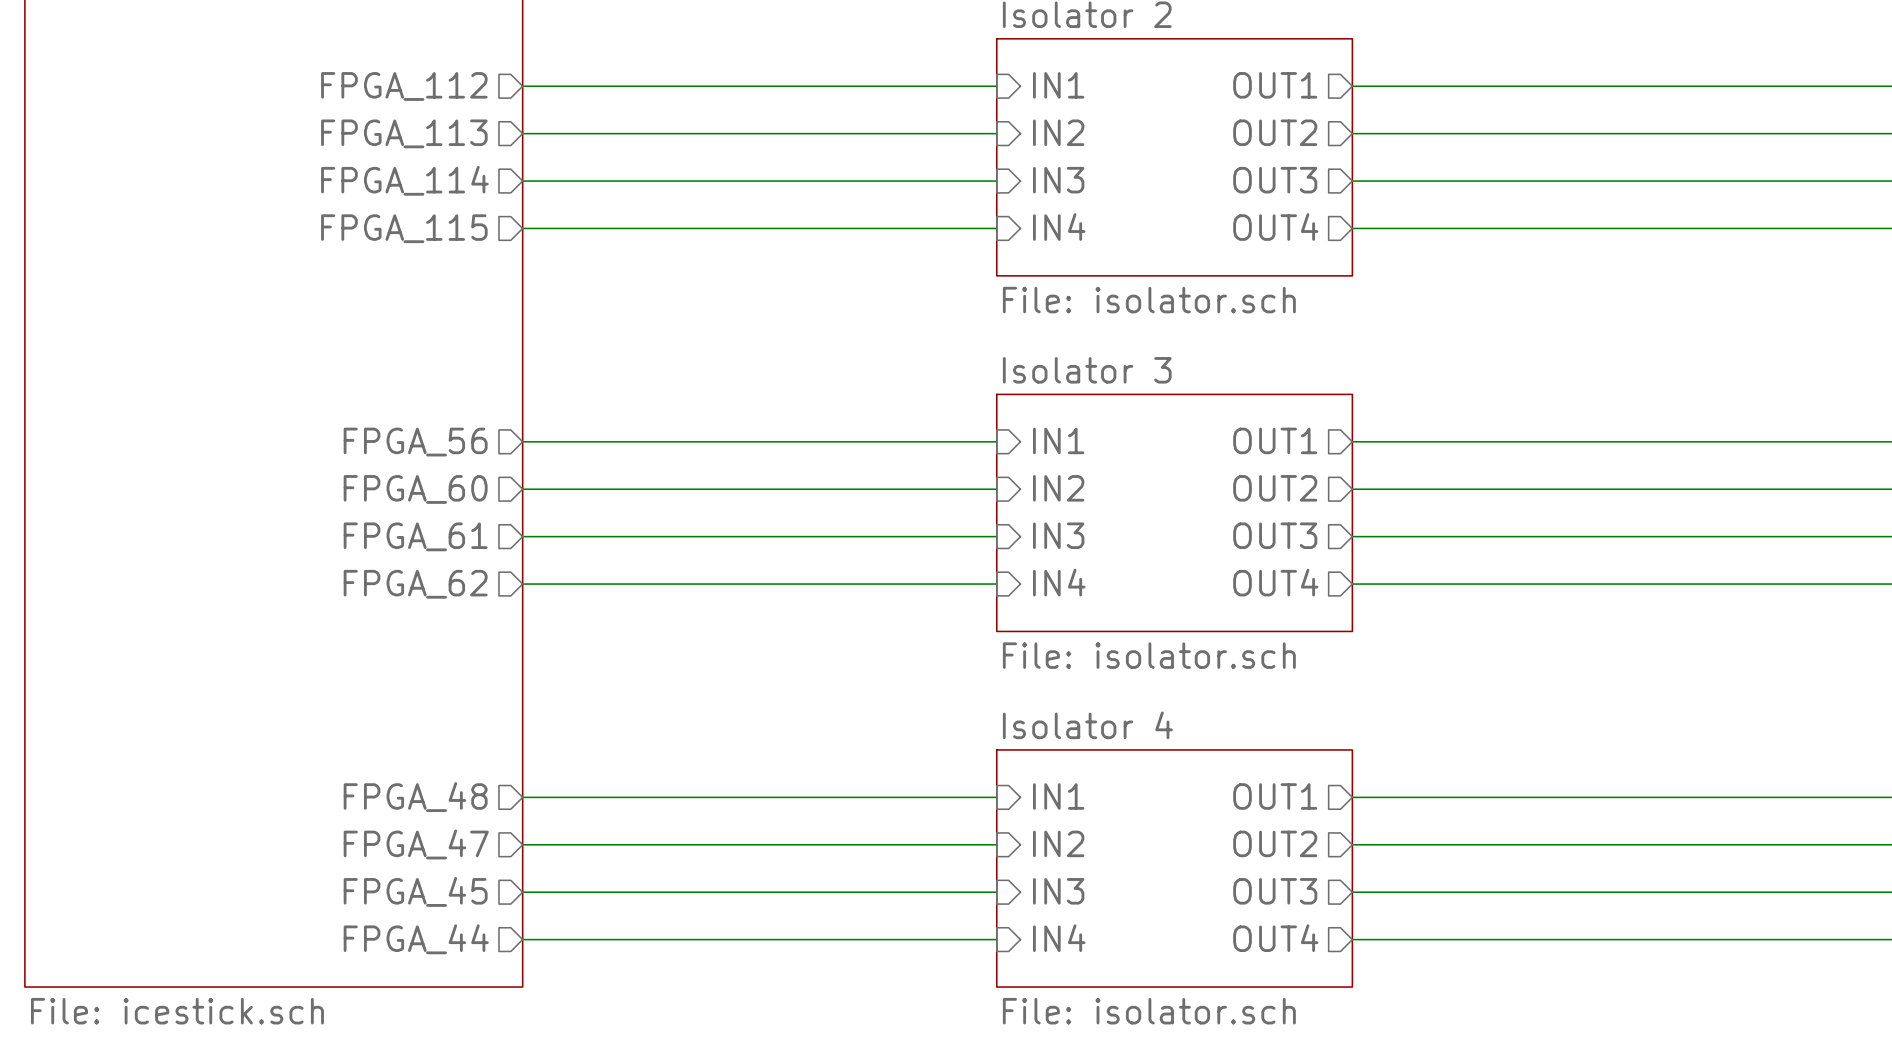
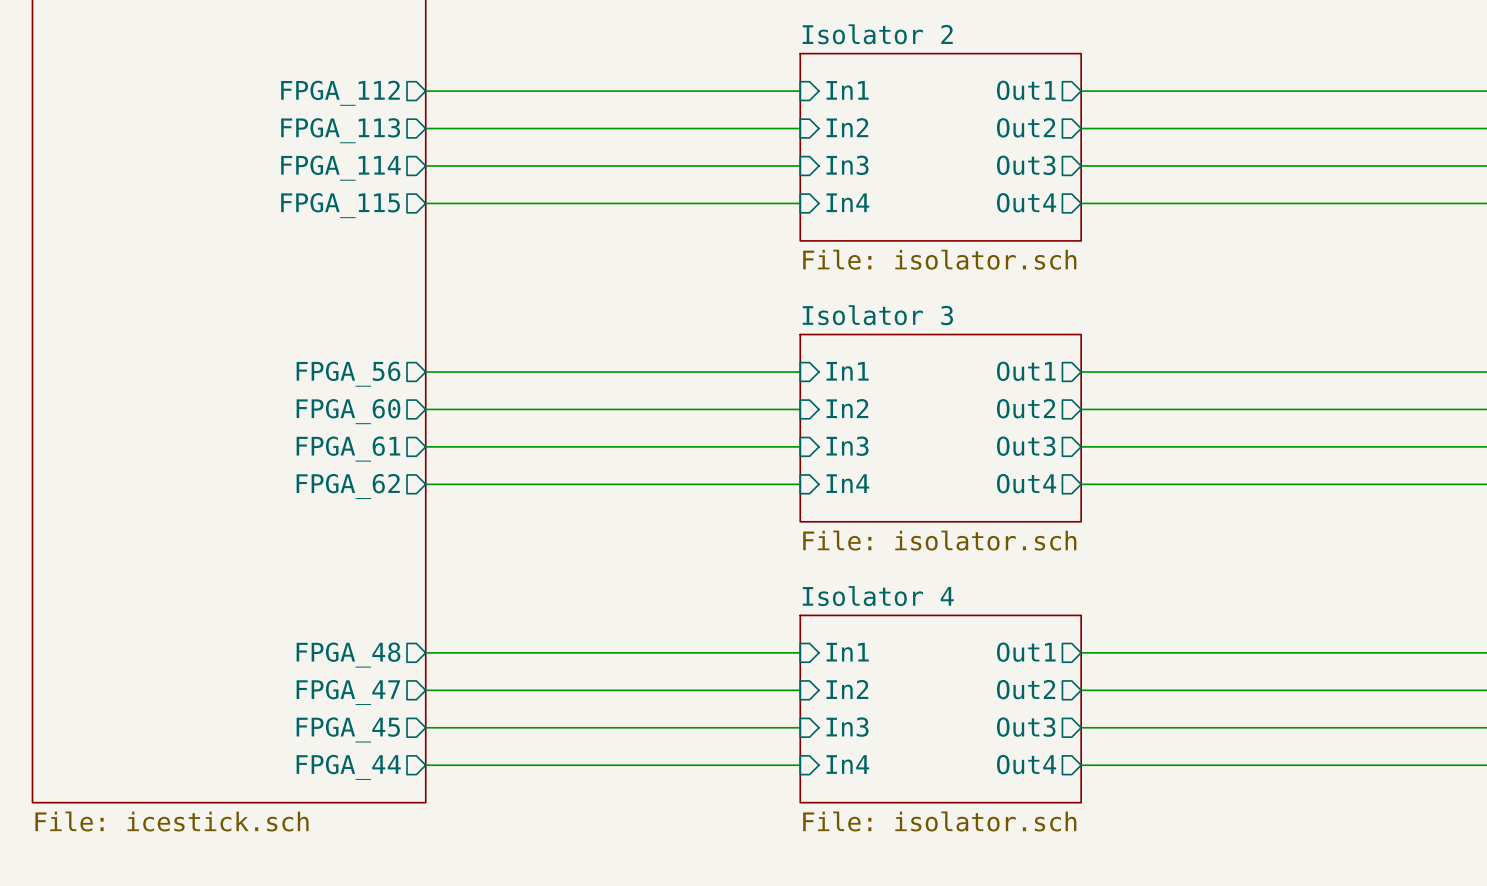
sheet pin: IN1 (1058, 85) -> In1 (847, 90)
sheet pin: OUT1 (1275, 85) -> Out1 (1026, 90)
sheet pin: IN2 (1058, 132) -> In2 (847, 127)
sheet pin: OUT2 (1275, 132) -> Out2 (1026, 127)
sheet pin: IN3 (1058, 180) -> In3 (847, 165)
sheet pin: OUT3 (1275, 180) -> Out3 (1026, 165)
sheet pin: IN4 (1059, 227) -> In4 (847, 202)
sheet pin: OUT4 (1275, 227) -> Out4 (1026, 202)
sheet pin: IN1 (1058, 440) -> In1 (847, 371)
sheet pin: OUT1 (1275, 440) -> Out1 (1026, 371)
sheet pin: IN2 (1058, 488) -> In2 (847, 408)
sheet pin: OUT2 (1275, 488) -> Out2 (1026, 408)
sheet pin: IN3 (1058, 535) -> In3 (847, 446)
sheet pin: OUT3 (1275, 535) -> Out3 (1026, 446)
sheet pin: IN4 (1059, 582) -> In4 (847, 483)
sheet pin: OUT4 (1275, 582) -> Out4 (1026, 483)
sheet pin: IN1 (1058, 796) -> In1 (847, 652)
sheet pin: OUT1 (1275, 796) -> Out1 (1026, 652)
sheet pin: IN2 (1058, 843) -> In2 (847, 689)
sheet pin: OUT2 (1275, 843) -> Out2 (1026, 689)
sheet pin: IN3 (1058, 891) -> In3 (847, 727)
sheet pin: OUT3 (1275, 891) -> Out3 (1026, 727)
sheet pin: IN4 (1059, 938) -> In4 (847, 764)
sheet pin: OUT4 (1275, 938) -> Out4 (1026, 764)

